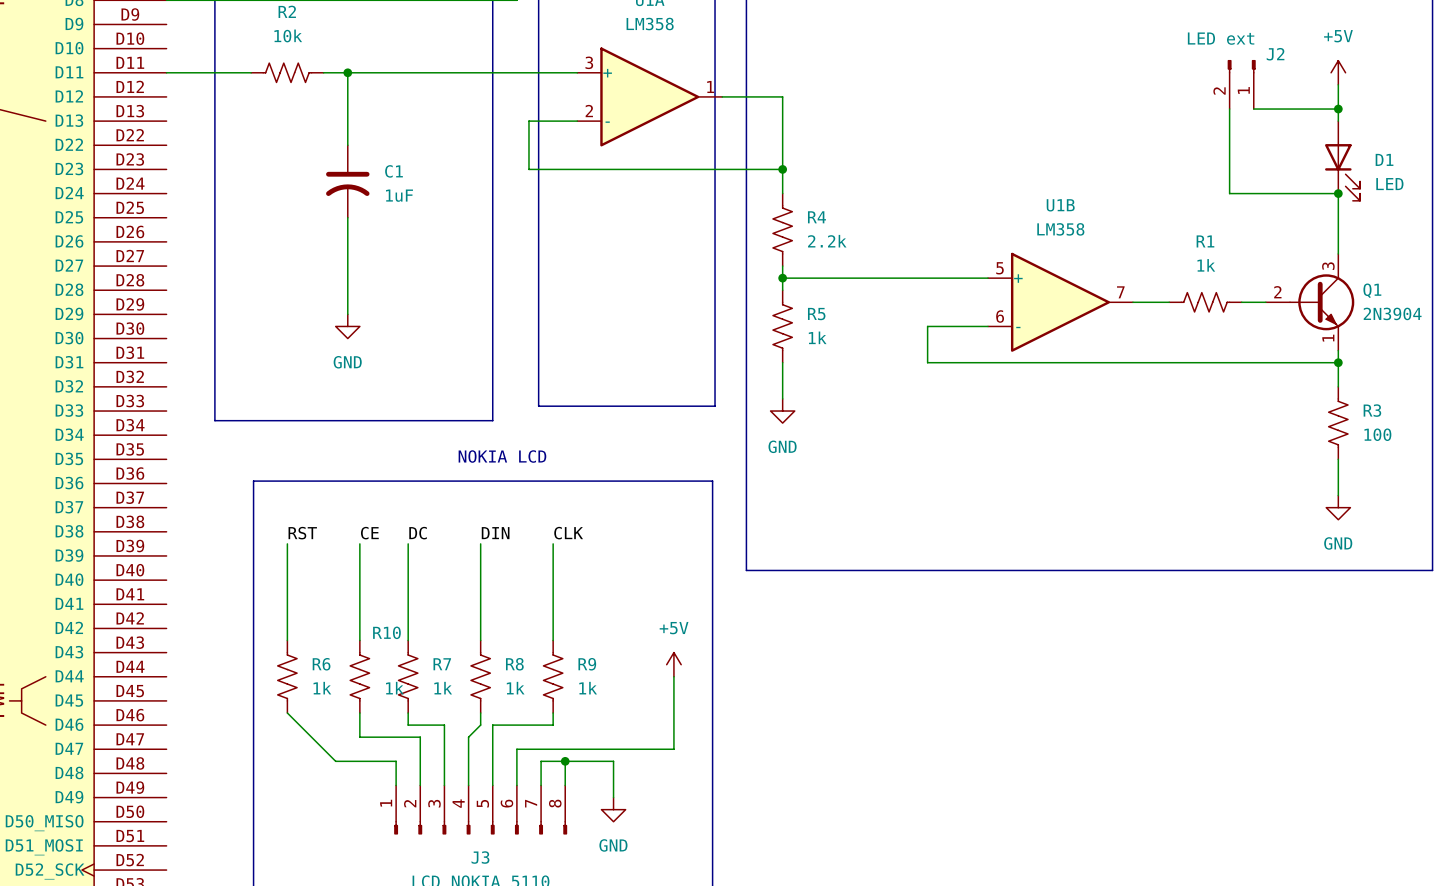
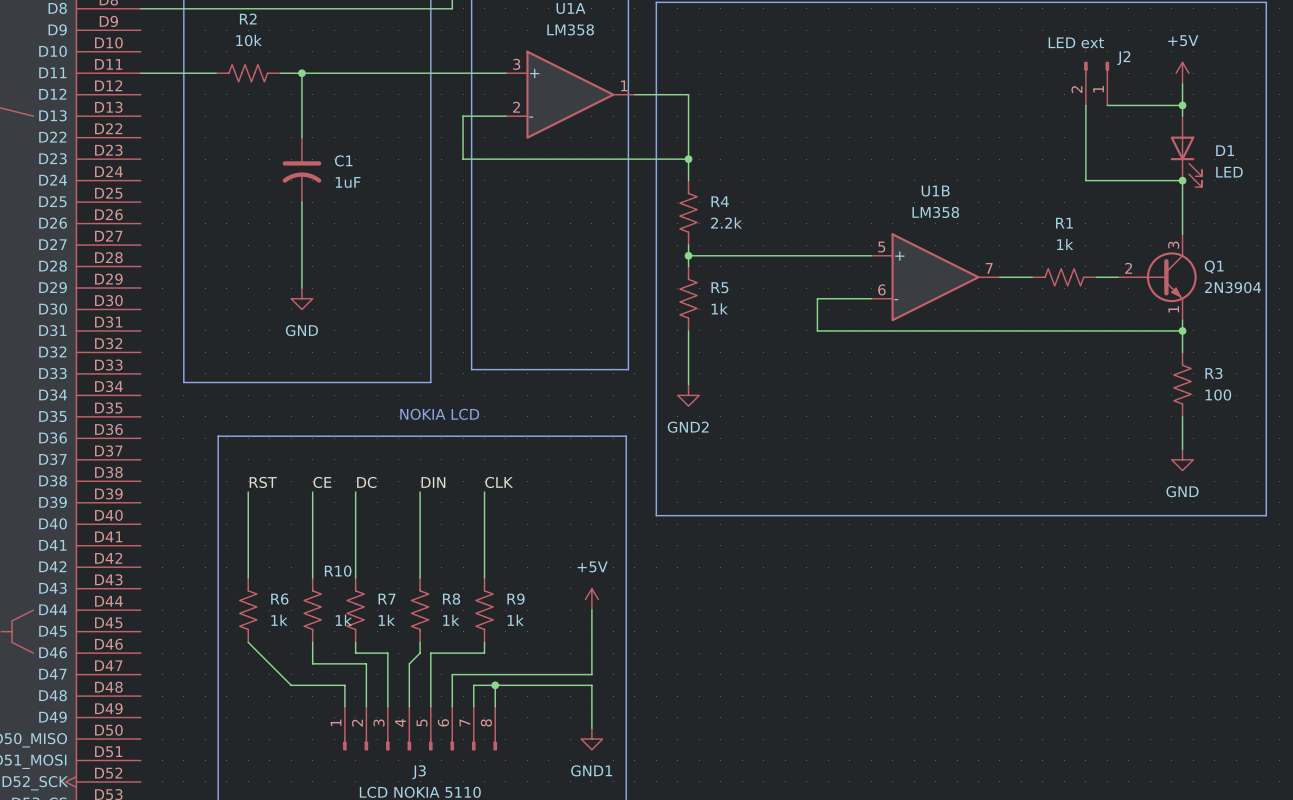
power symbol: GND (782, 411) -> none
power symbol: none -> GND2 (688, 395)
wire: (613, 761) (613, 797) -> (538, 685) (591, 685) (591, 728)
power symbol: GND (613, 809) -> none
power symbol: none -> GND1 (591, 739)

